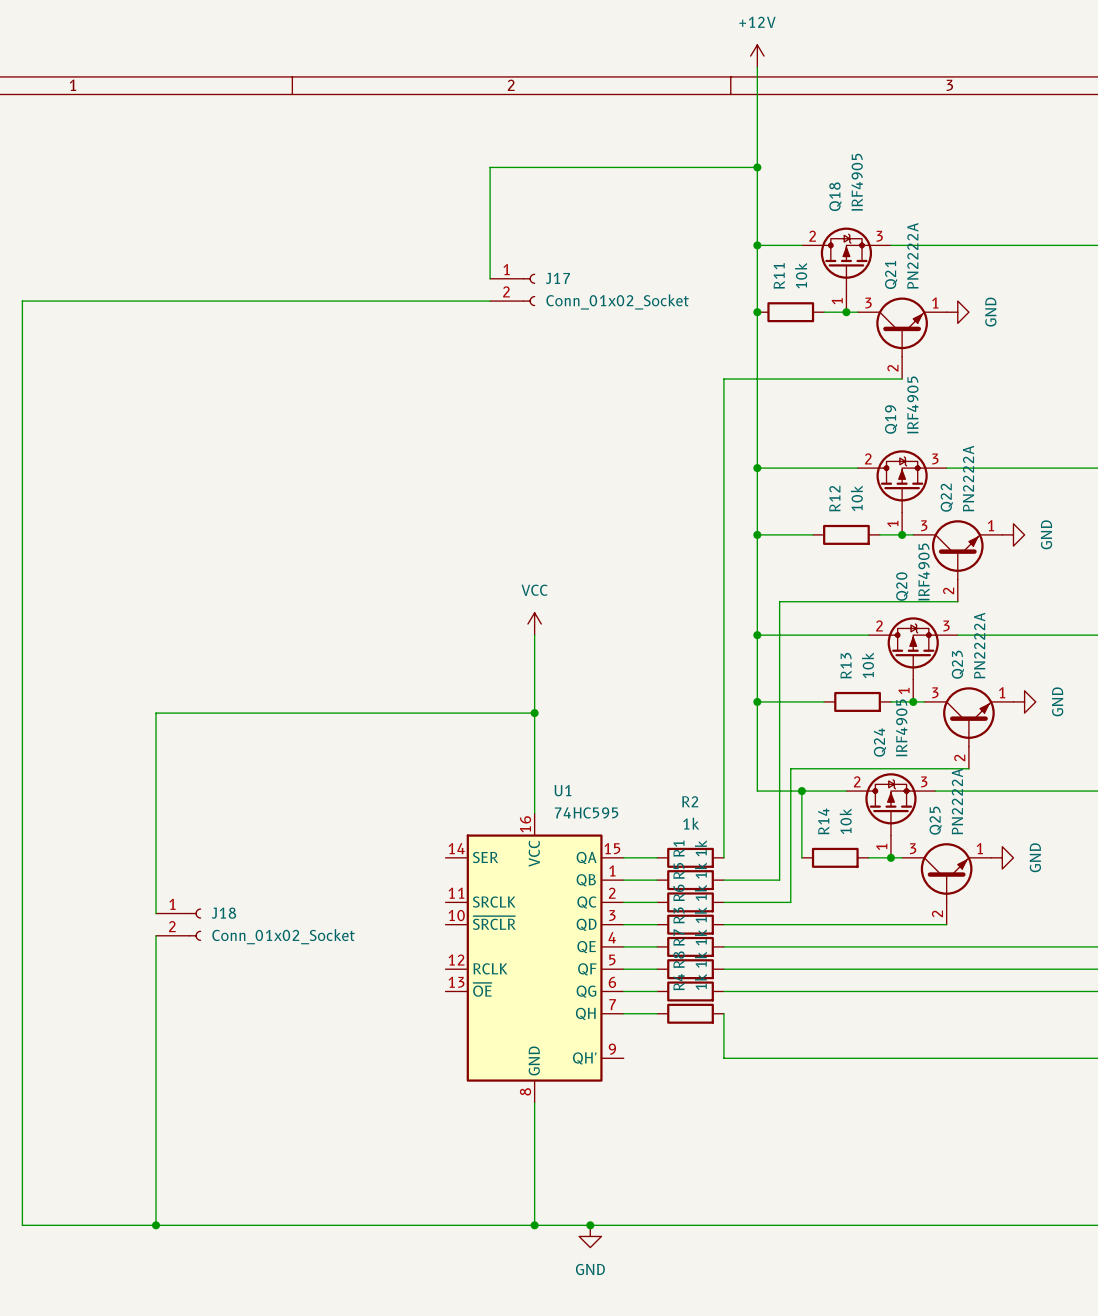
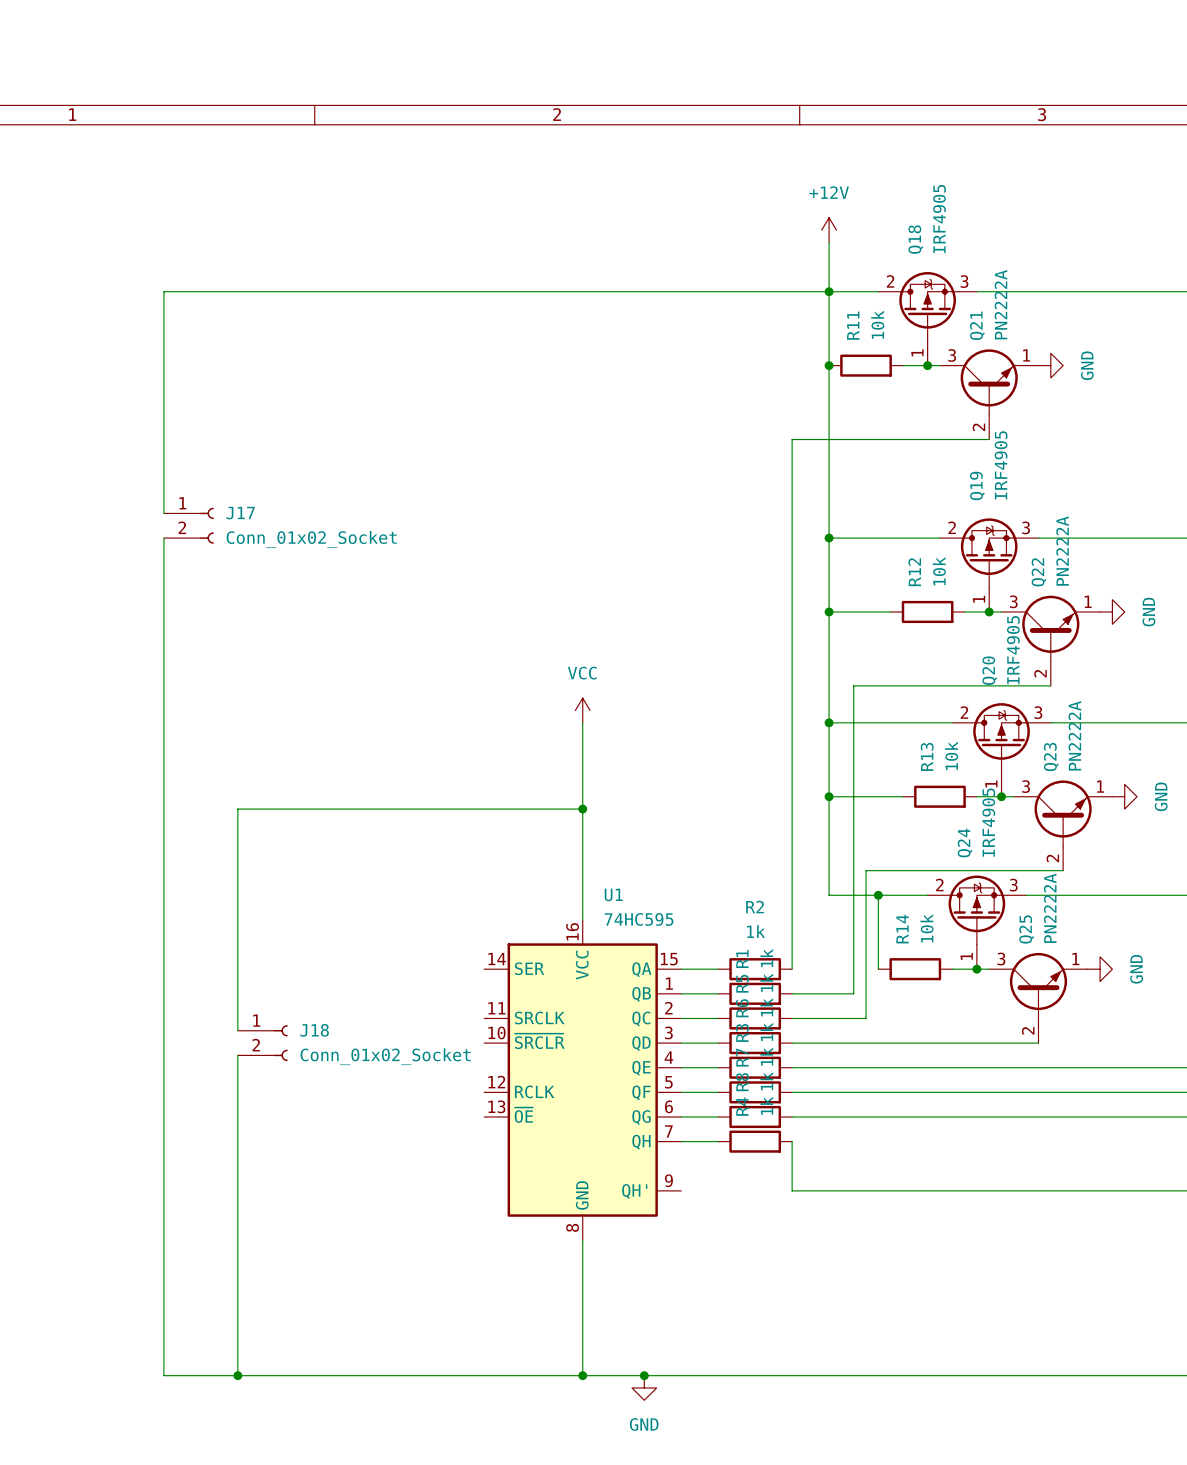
power symbol position: +12V (757, 56) -> +12V (829, 230)
wire: (757, 67) (757, 200) -> none
wire: (757, 167) (490, 167) (490, 278) -> none
junction: (757, 167) -> none
wire: none -> (829, 291) (163, 291) (163, 513)
J17 position: (512, 289) -> (188, 525)
wire: (490, 301) (22, 301) (22, 1225) (156, 1225) -> none
wire: none -> (163, 538) (163, 809)
wire: (156, 713) (222, 713) -> (237, 1030) (237, 809)
wire: none -> (163, 1030) (163, 1055)
J18 position: (178, 924) -> (262, 1043)
wire: none -> (237, 1055) (237, 1375)
junction: (156, 1225) -> none
junction: none -> (237, 1375)

